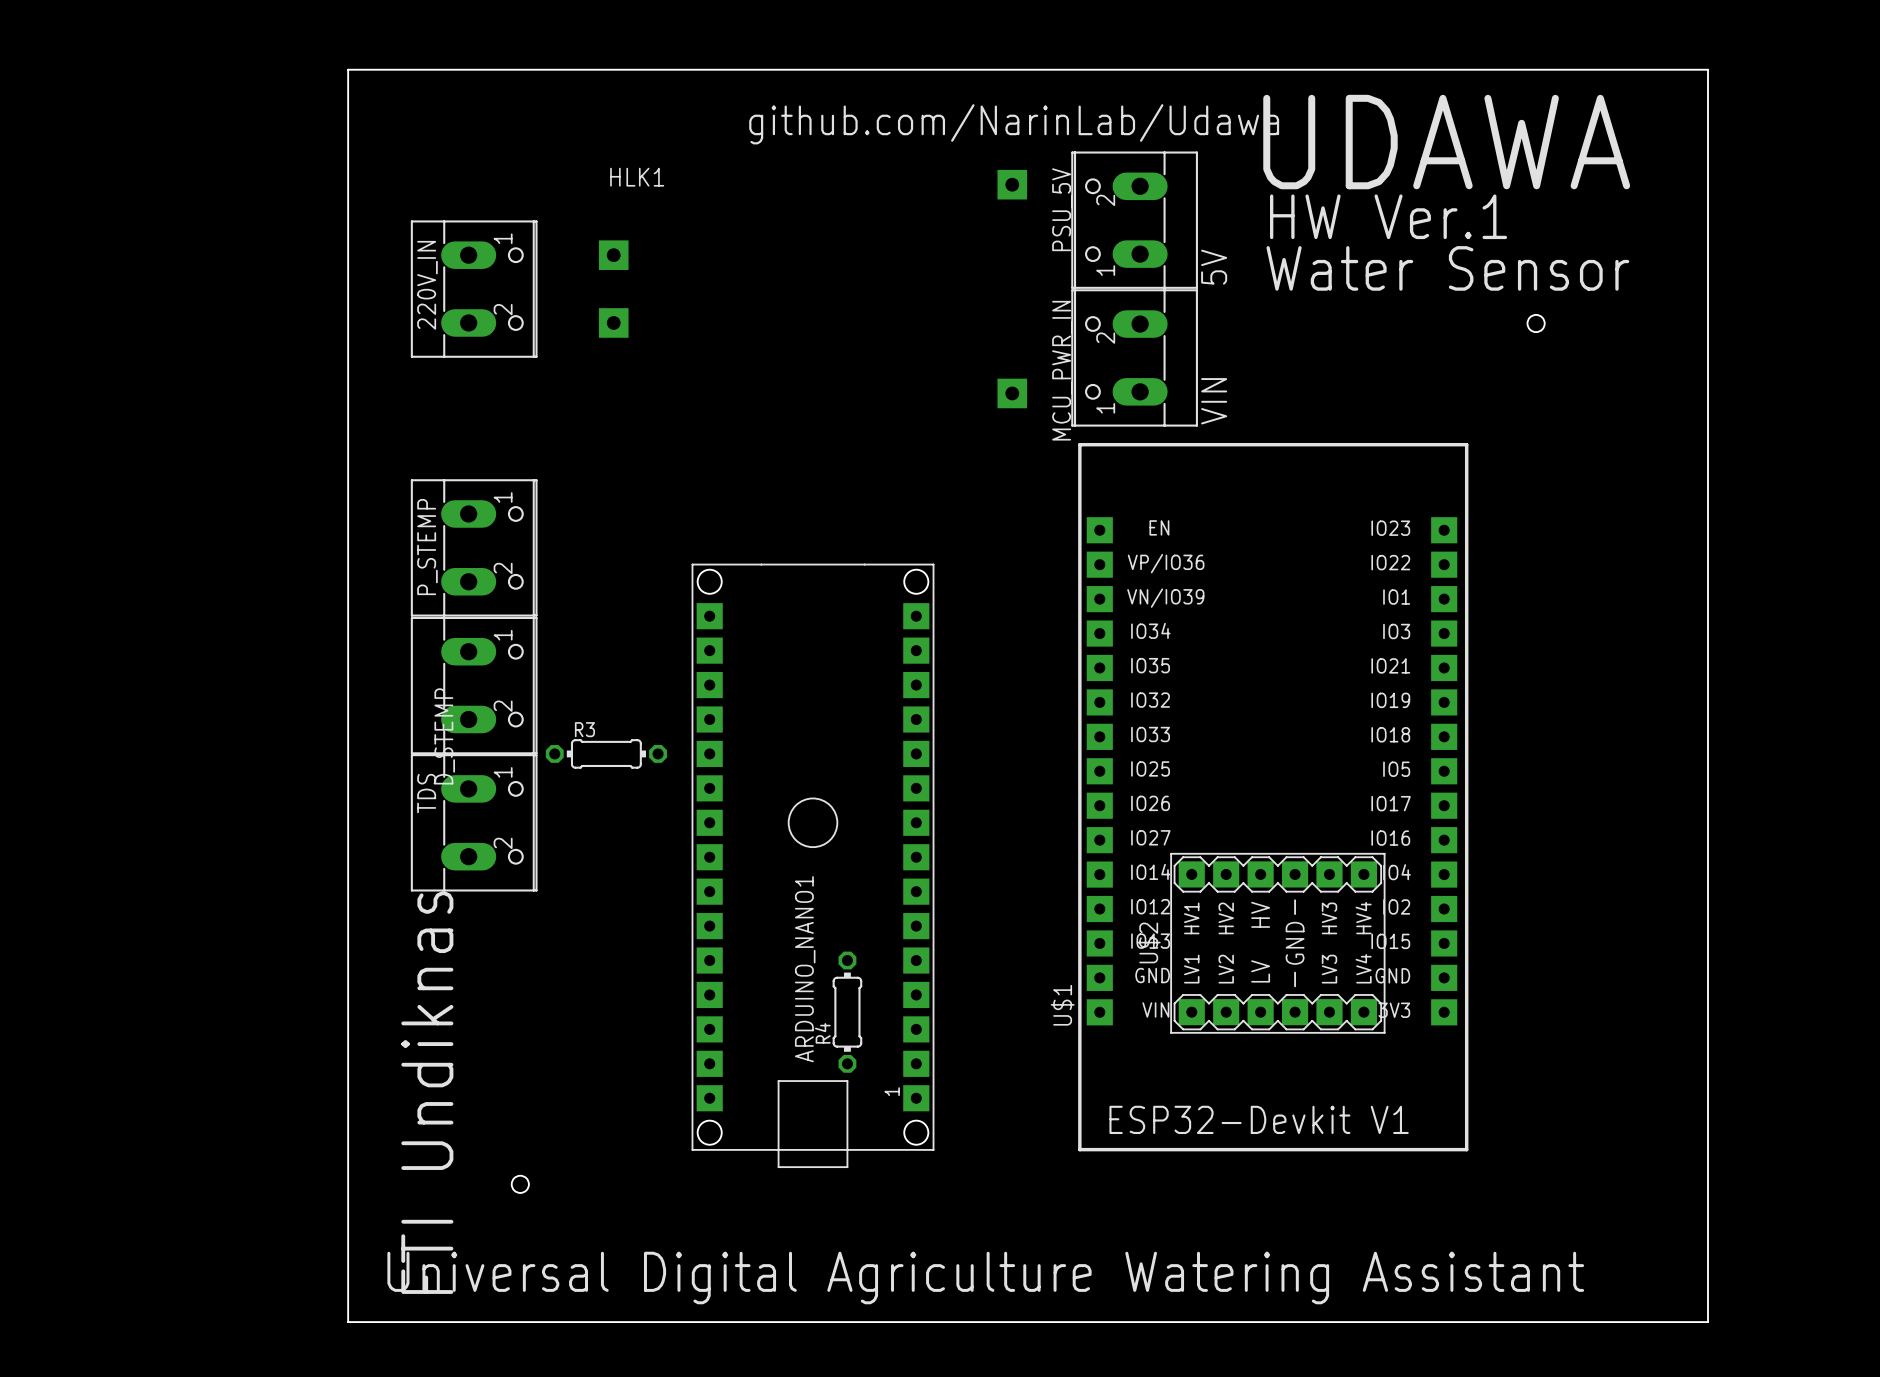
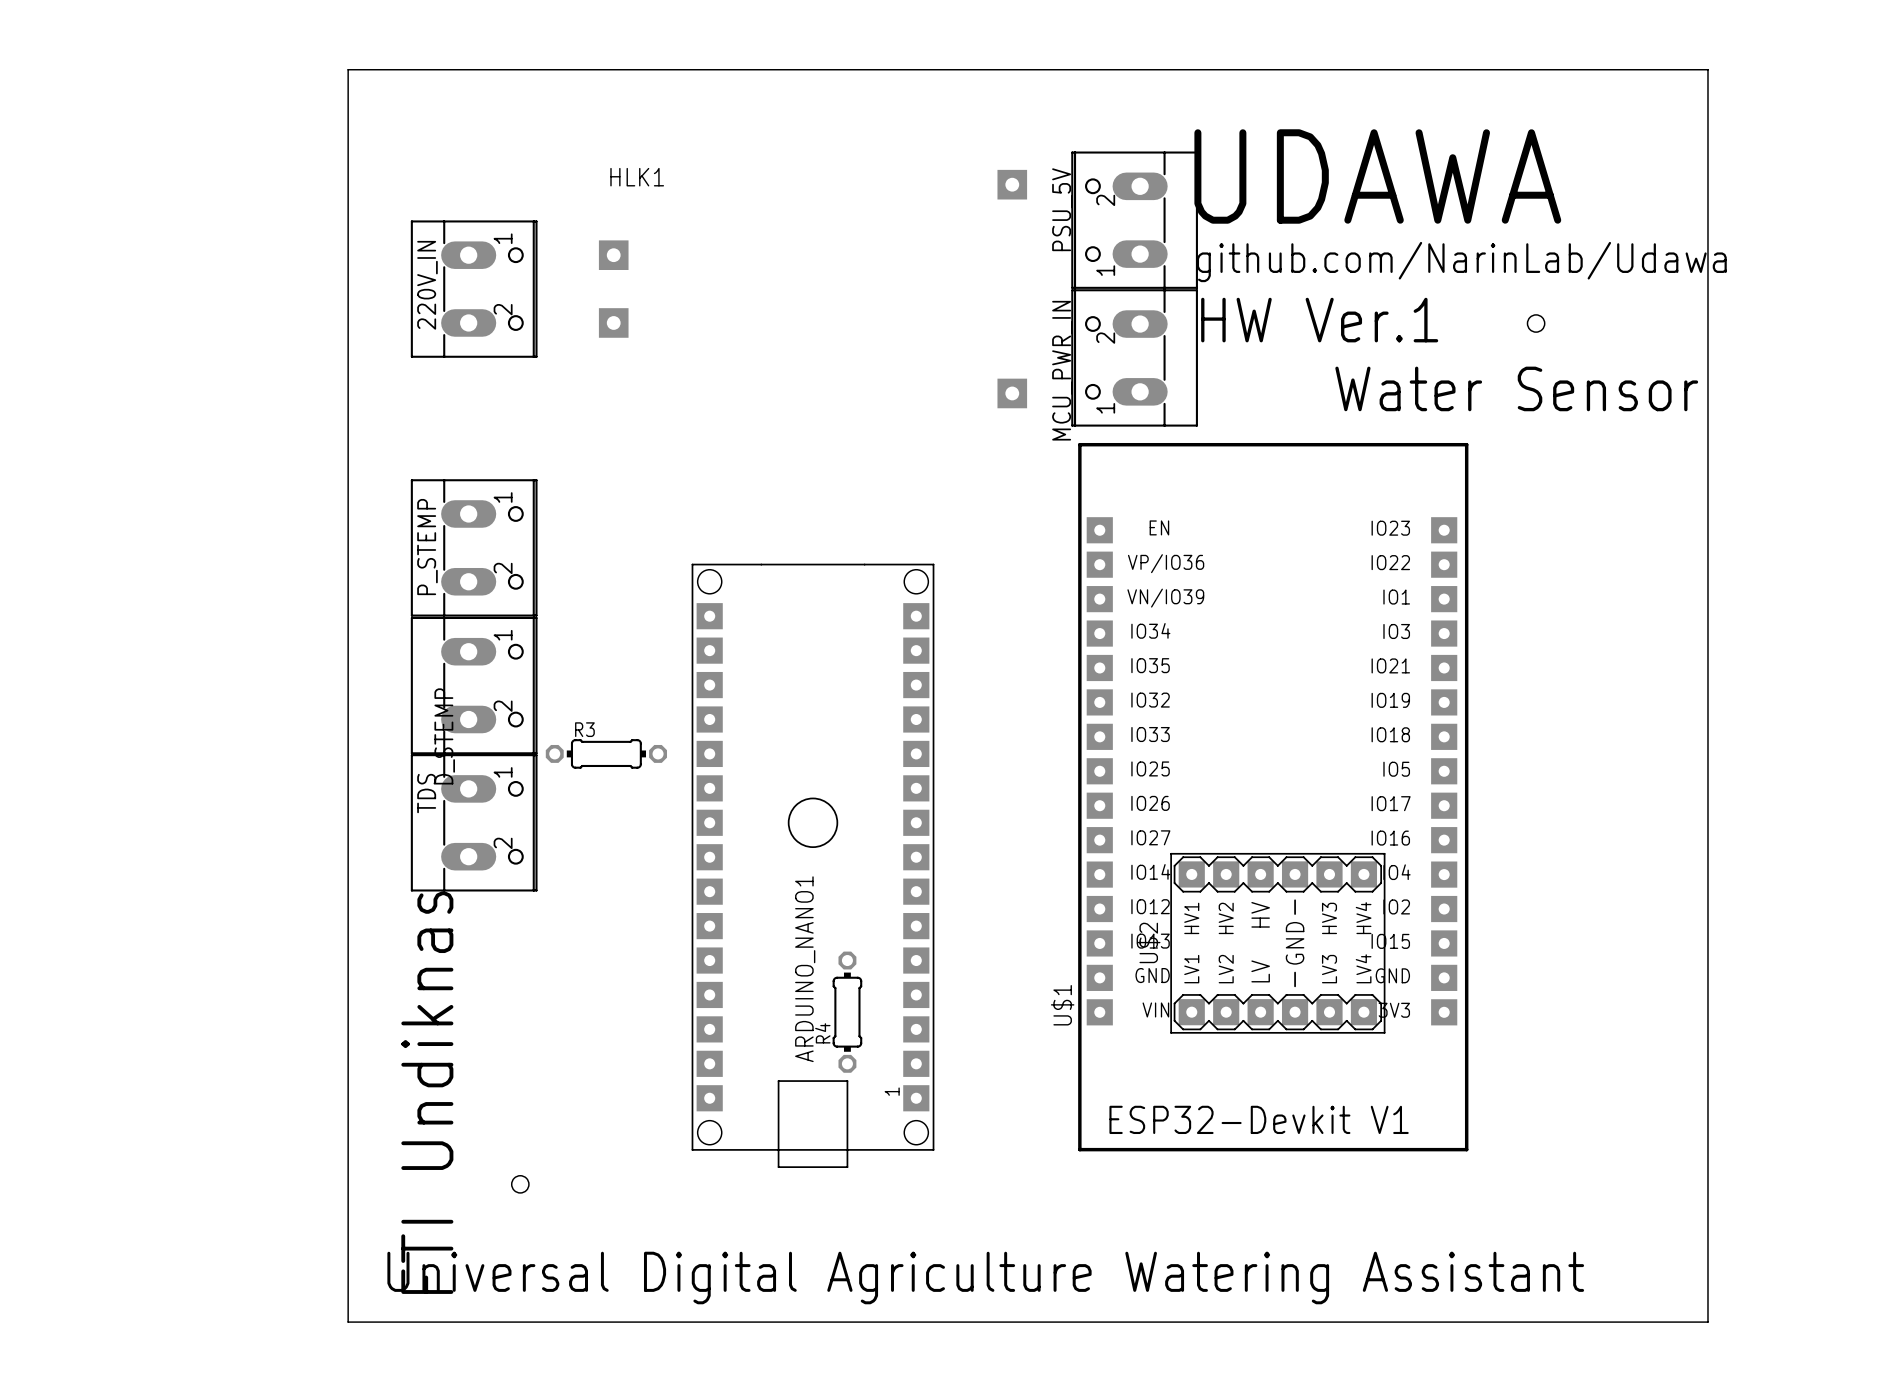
text: github.com/NarinLab/Udawa (1014, 124) -> none
text position: UDAWA (1446, 142) -> UDAWA (1377, 176)
text position: HW Ver.1 (1388, 216) -> HW Ver.1 (1319, 320)
text: none -> github.com/NarinLab/Udawa (1461, 262)
text: 5V (1214, 267) -> none
text position: Water Sensor (1447, 268) -> Water Sensor (1516, 388)
text: VIN (1214, 401) -> none

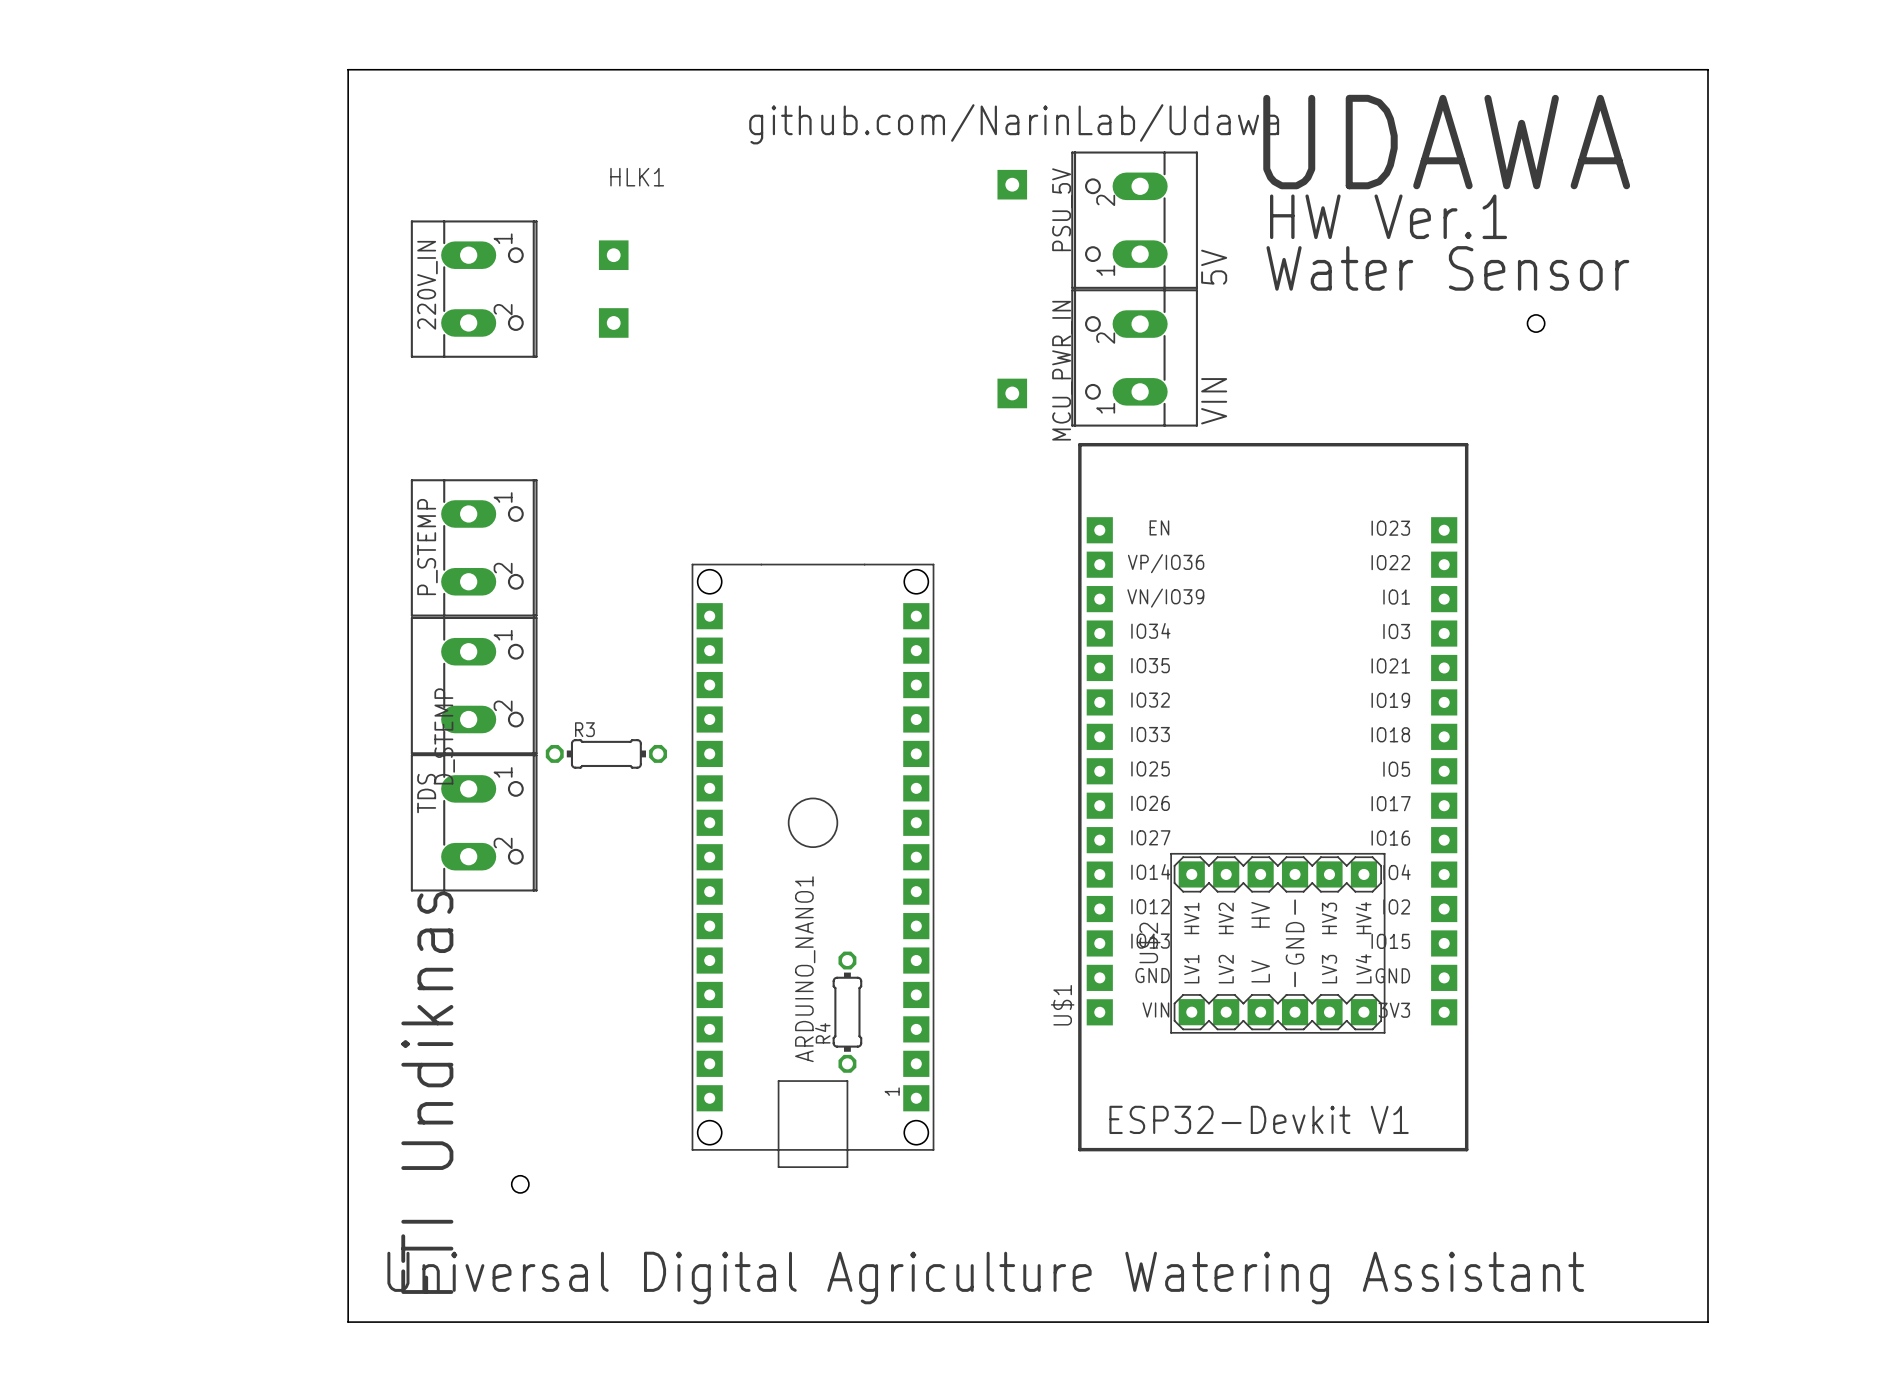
text: none -> github.com/NarinLab/Udawa (1014, 124)
text position: UDAWA (1377, 176) -> UDAWA (1446, 142)
text: github.com/NarinLab/Udawa (1461, 262) -> none
text: none -> 5V (1214, 267)
text position: HW Ver.1 (1319, 320) -> HW Ver.1 (1388, 216)
text position: Water Sensor (1516, 388) -> Water Sensor (1447, 268)
text: none -> VIN (1214, 401)

